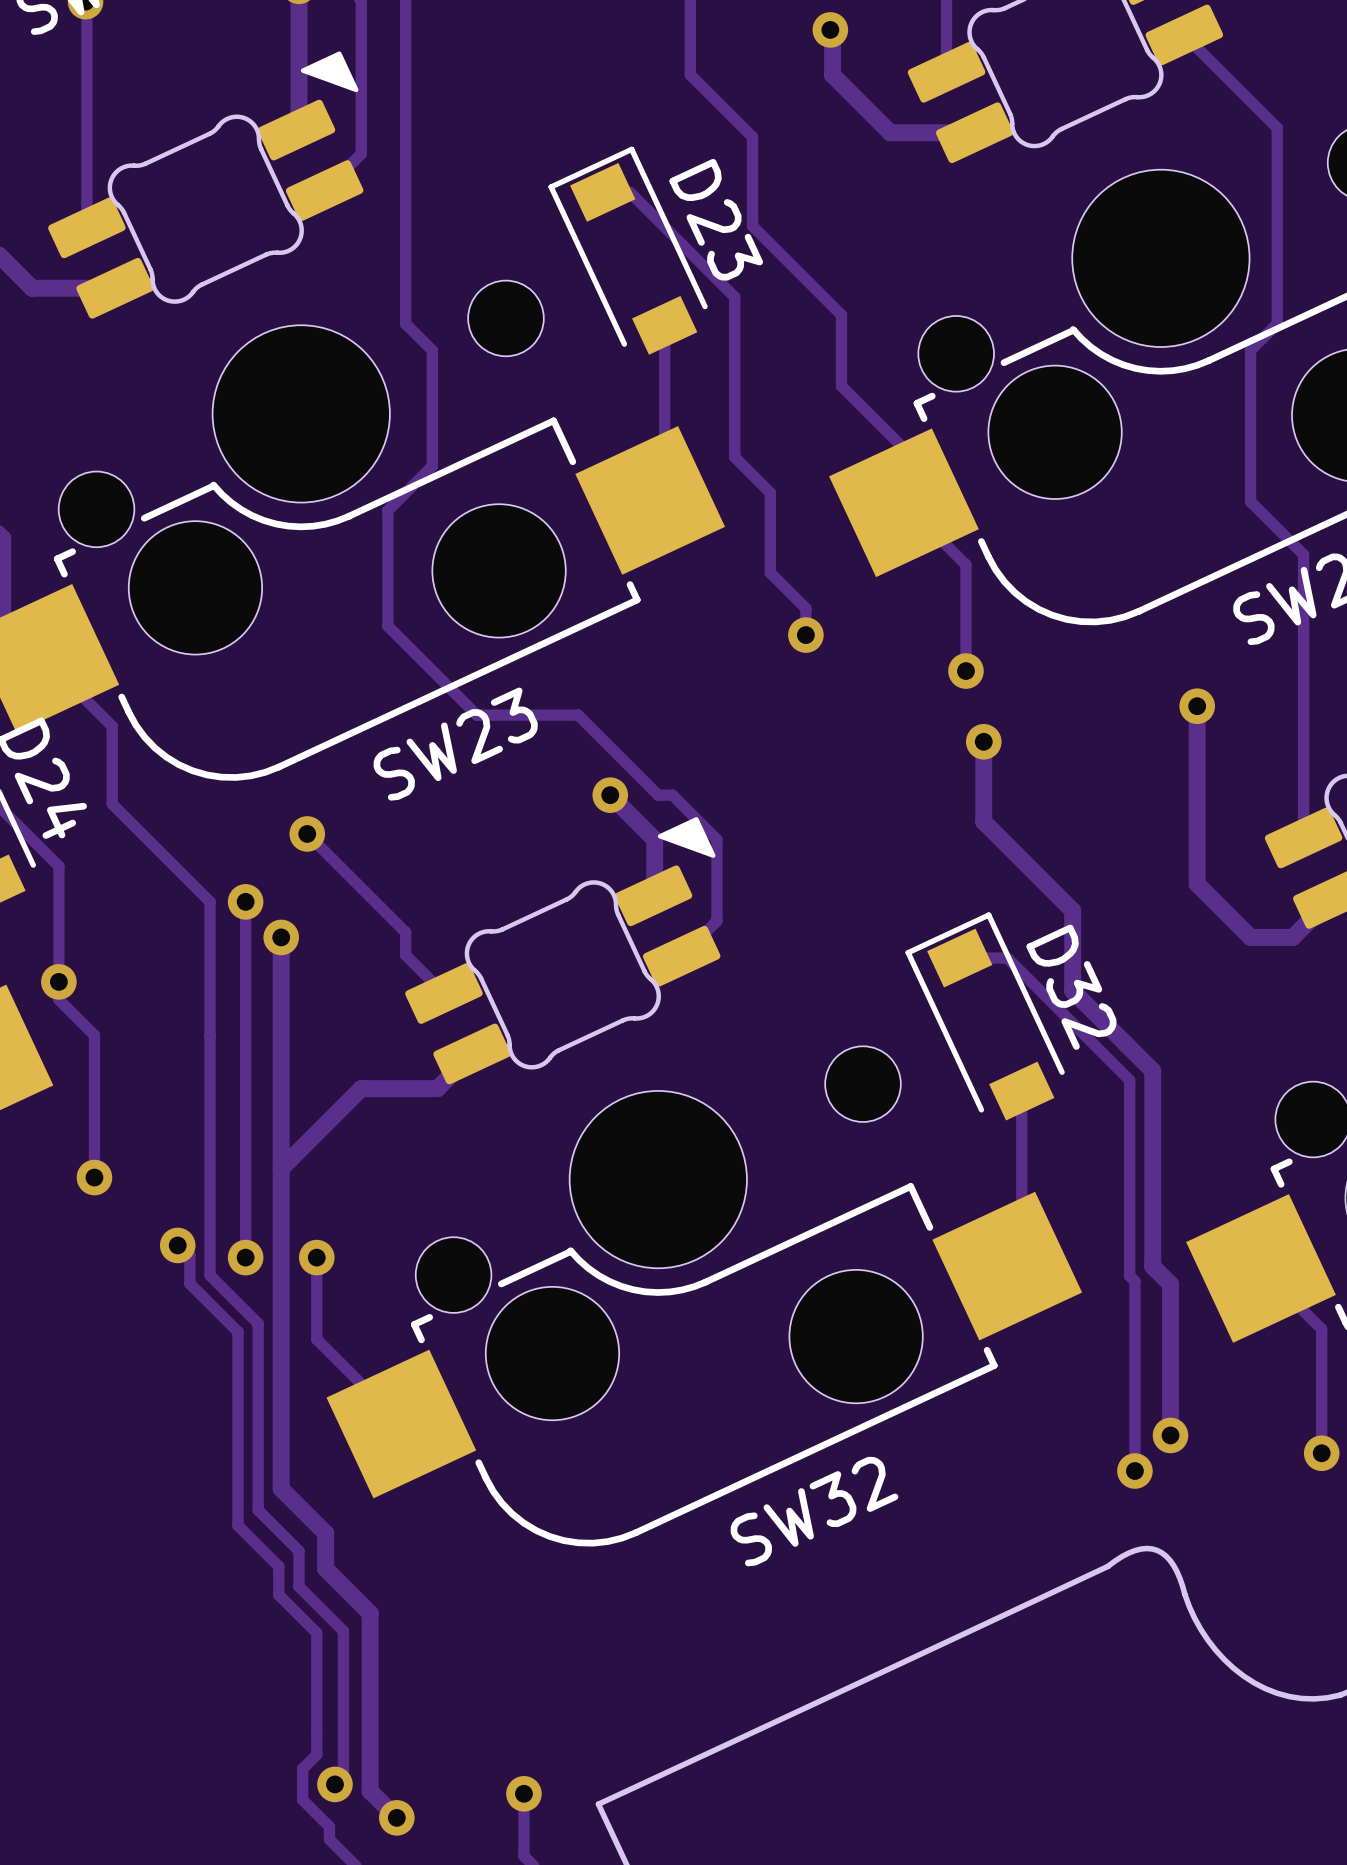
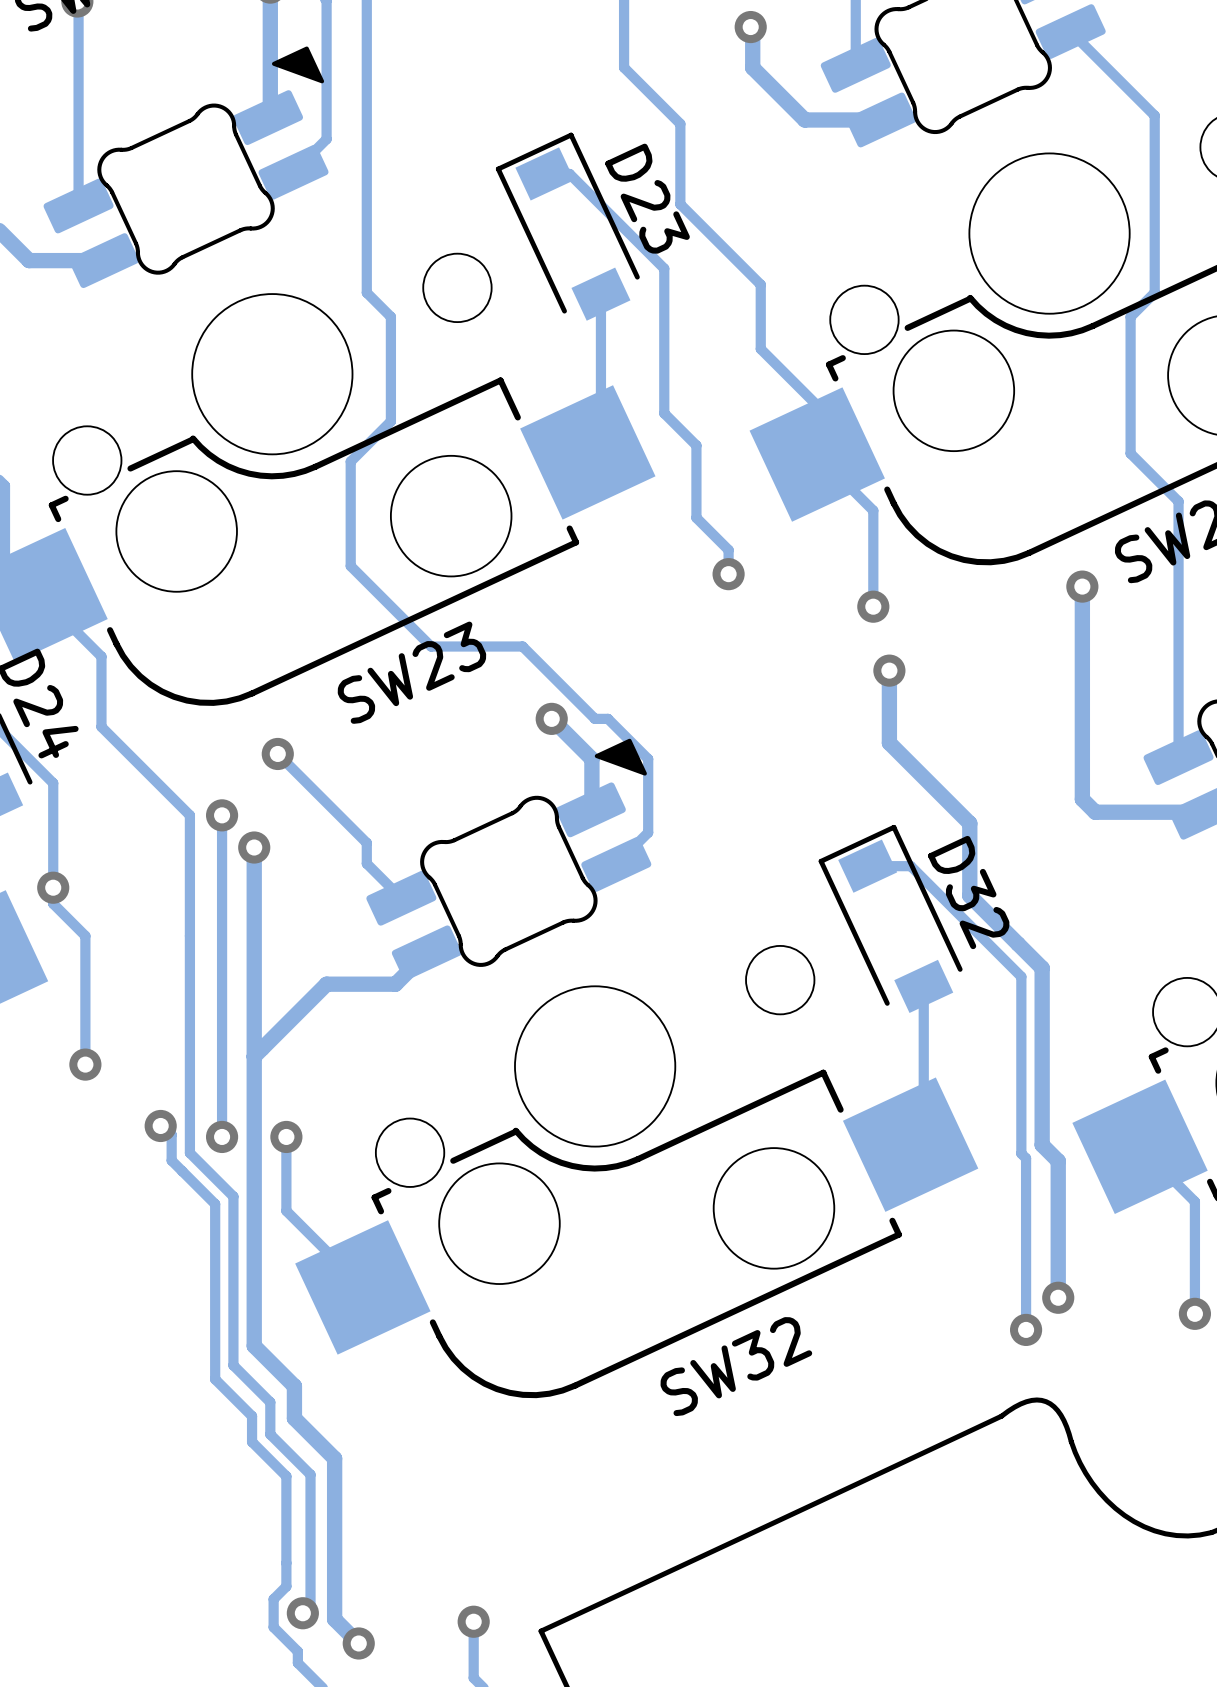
track: none -> (1082, 586) (1082, 638)
via position: (1197, 706) -> (1082, 586)
track: (1331, 898) (1292, 937) (1250, 937) (1211, 898) -> (1204, 812) (1095, 812)

